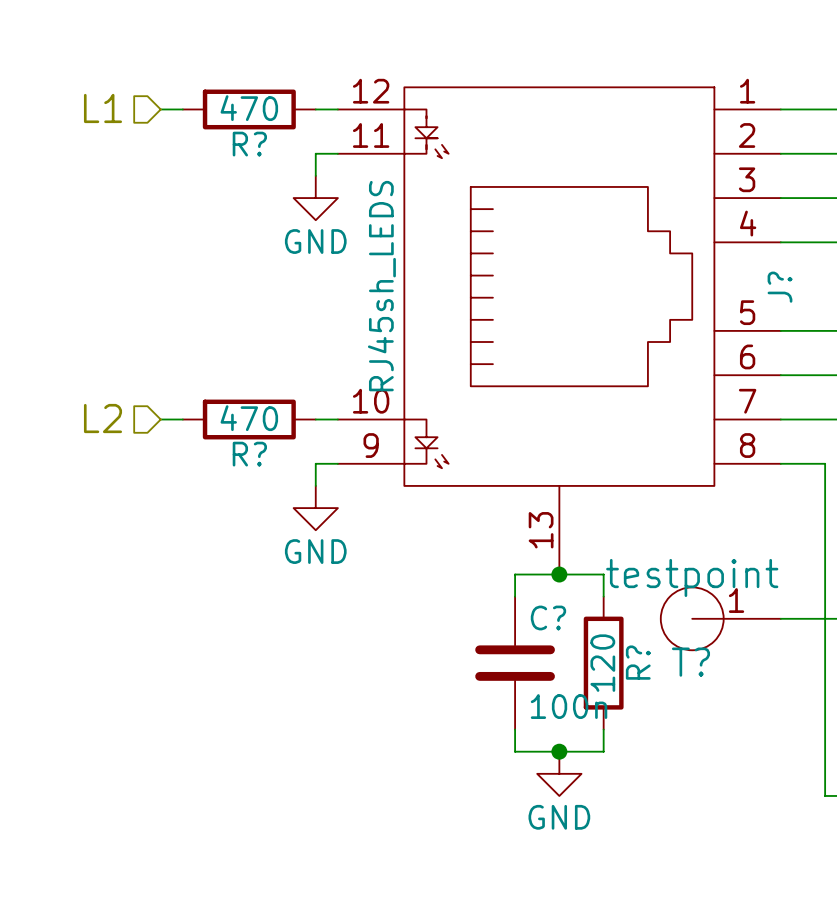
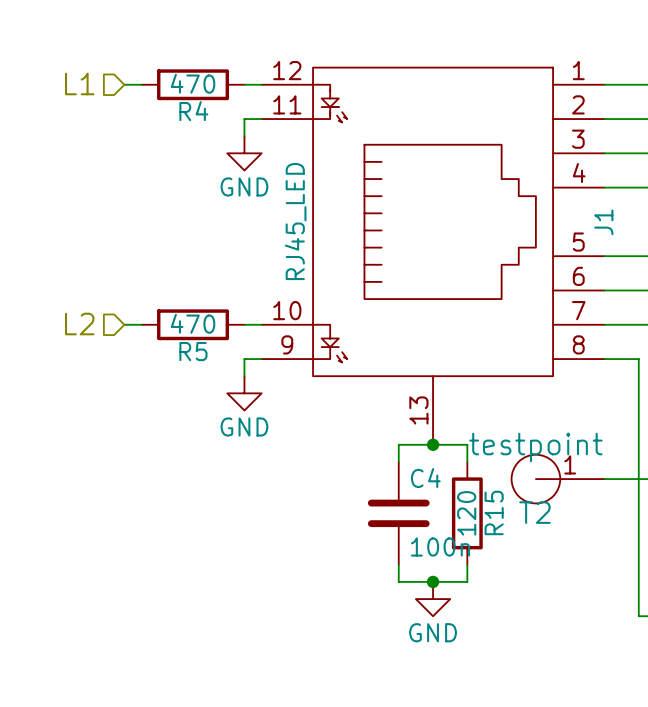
R? name: R? (249, 144) -> R4 (193, 111)
J? value: RJ45sh_LEDS (381, 286) -> RJ45_LED (295, 221)
J? name: J? (779, 287) -> J1 (603, 222)
R? name: R? (249, 454) -> R5 (193, 351)
C? name: C? (548, 617) -> C4 (425, 478)
R? name: R? (638, 662) -> R15 (494, 512)
T? name: T? (690, 662) -> T2 (534, 512)

